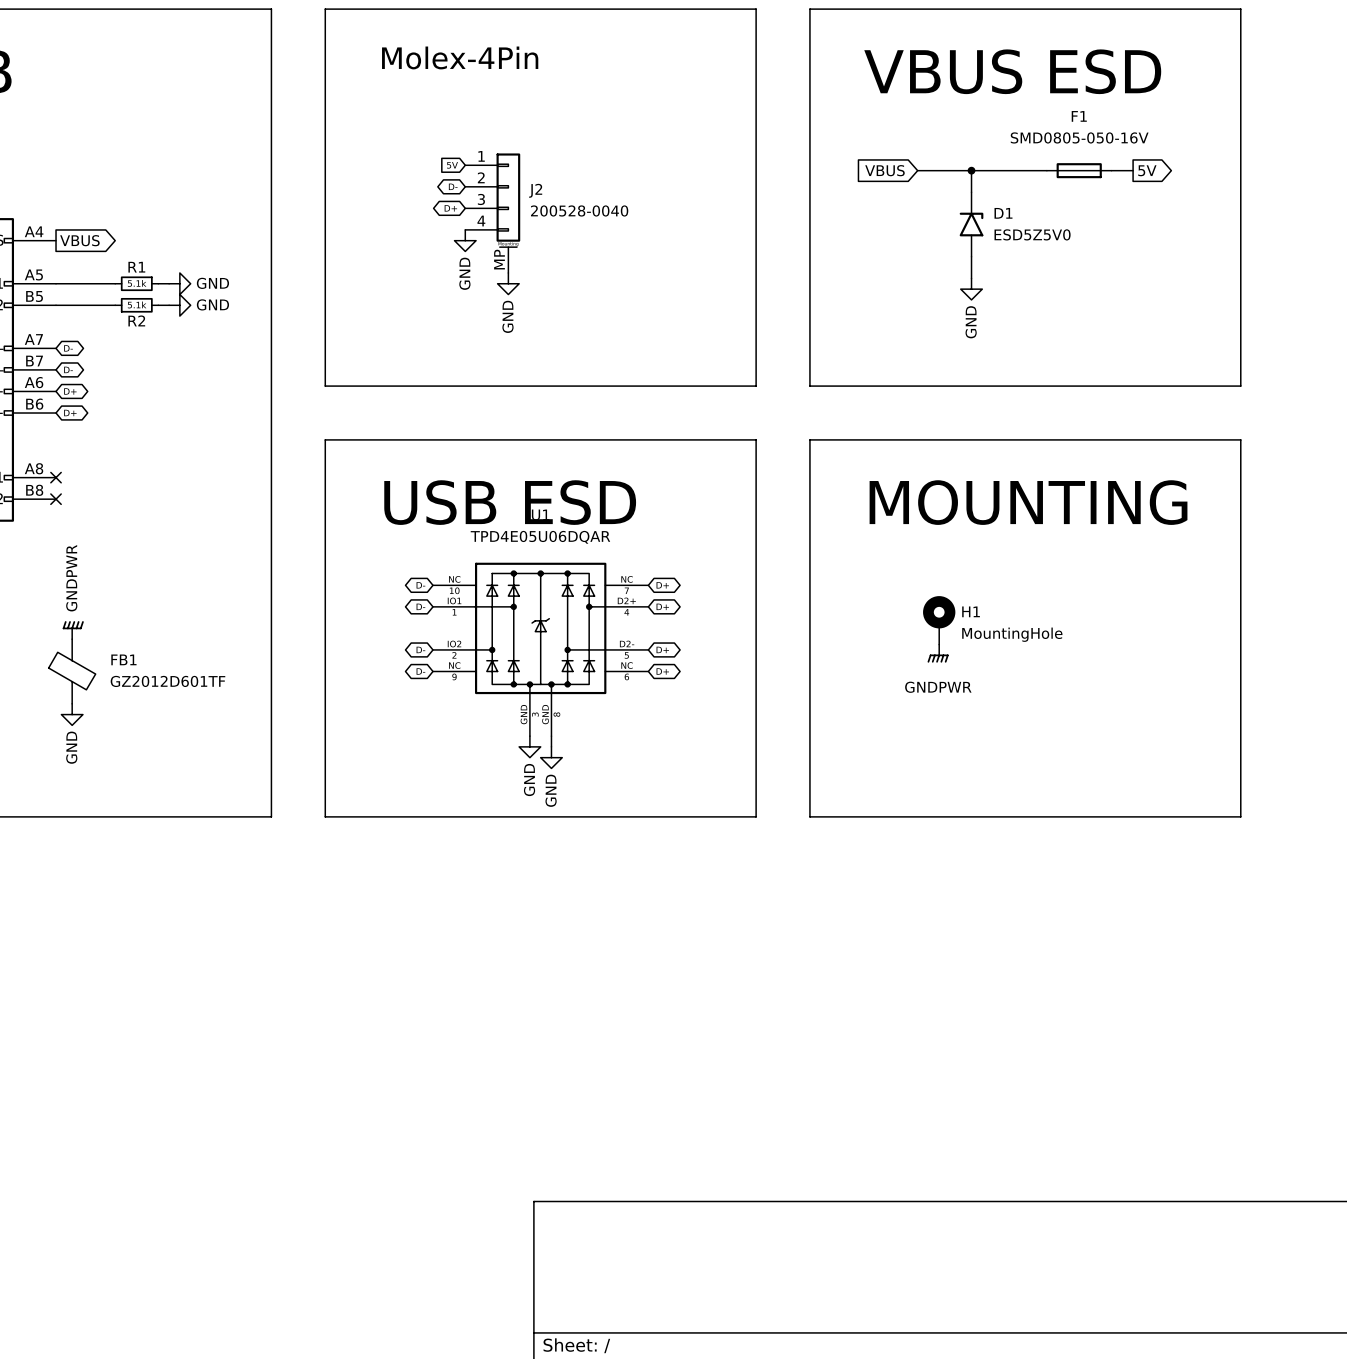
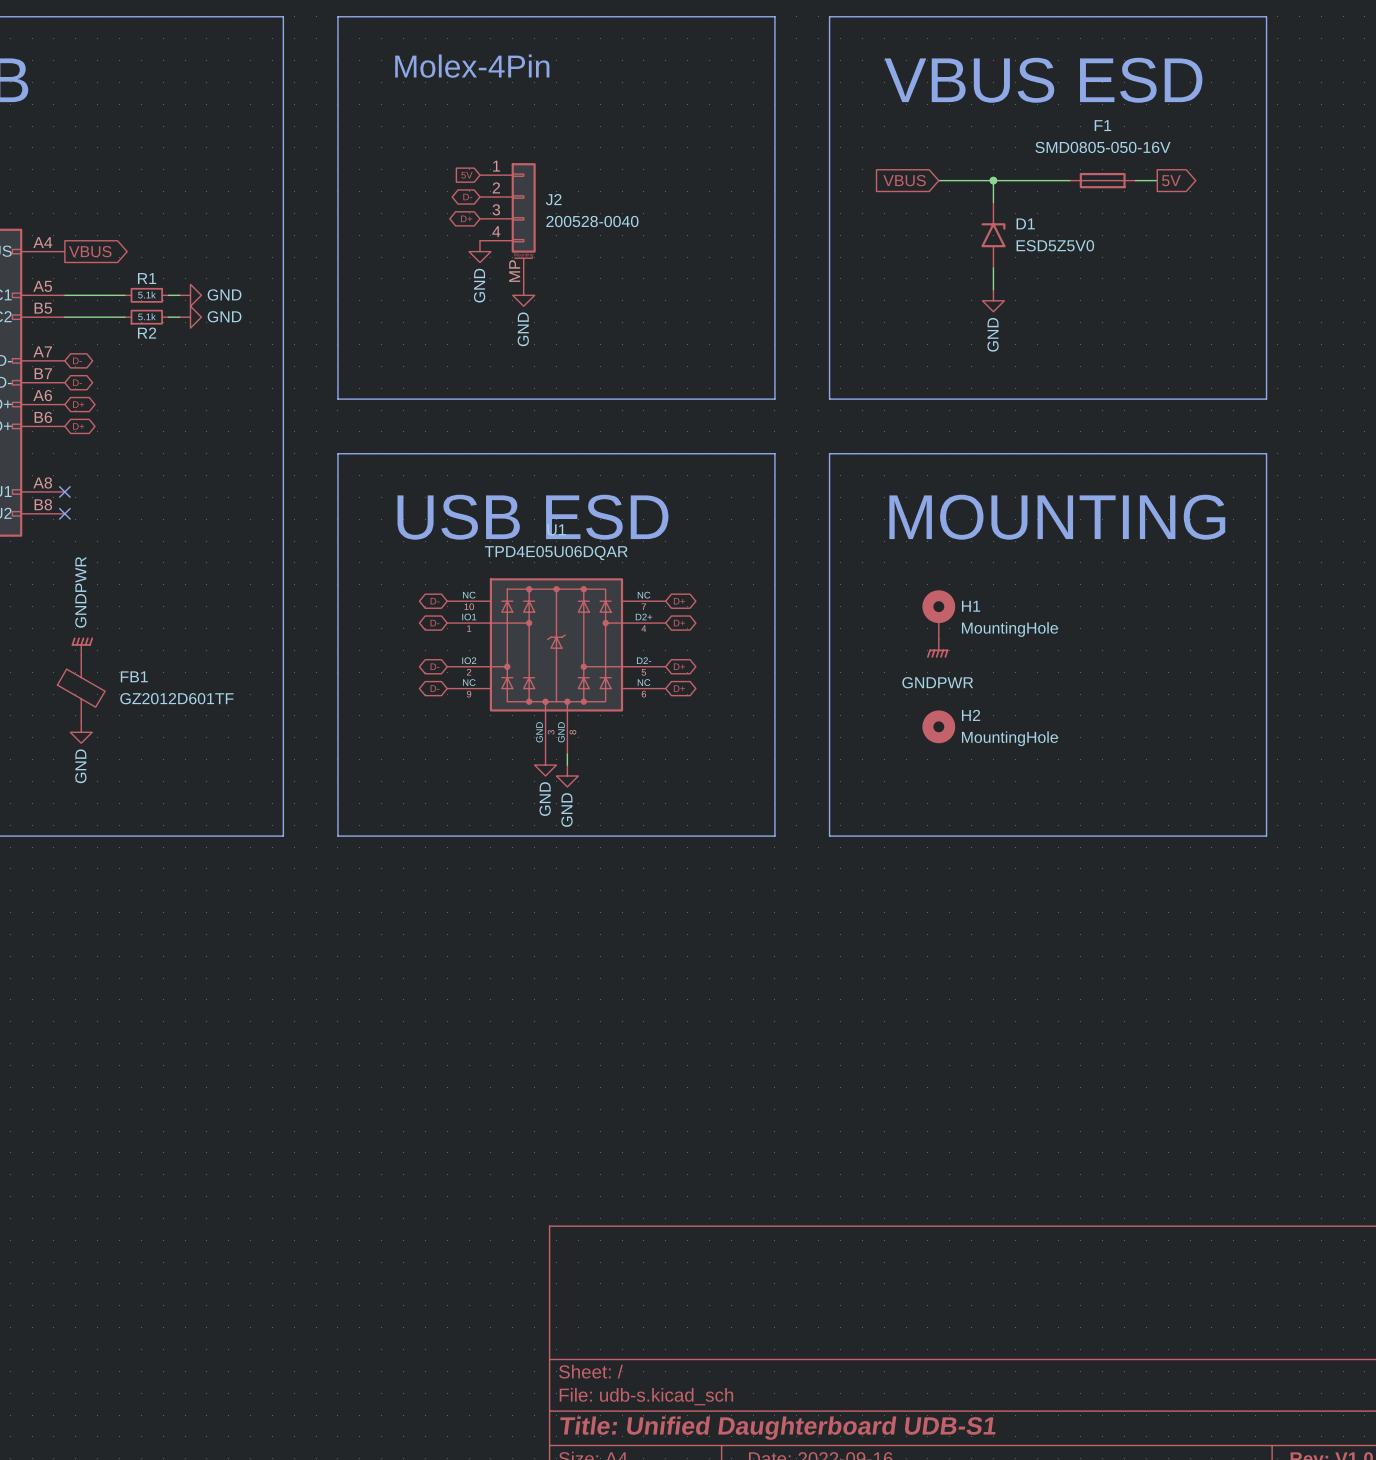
H1 position: (939, 620) -> (938, 614)
power symbol position: GNDPWR (938, 653) -> GNDPWR (937, 648)
H2: none -> MountingHole (938, 726)

